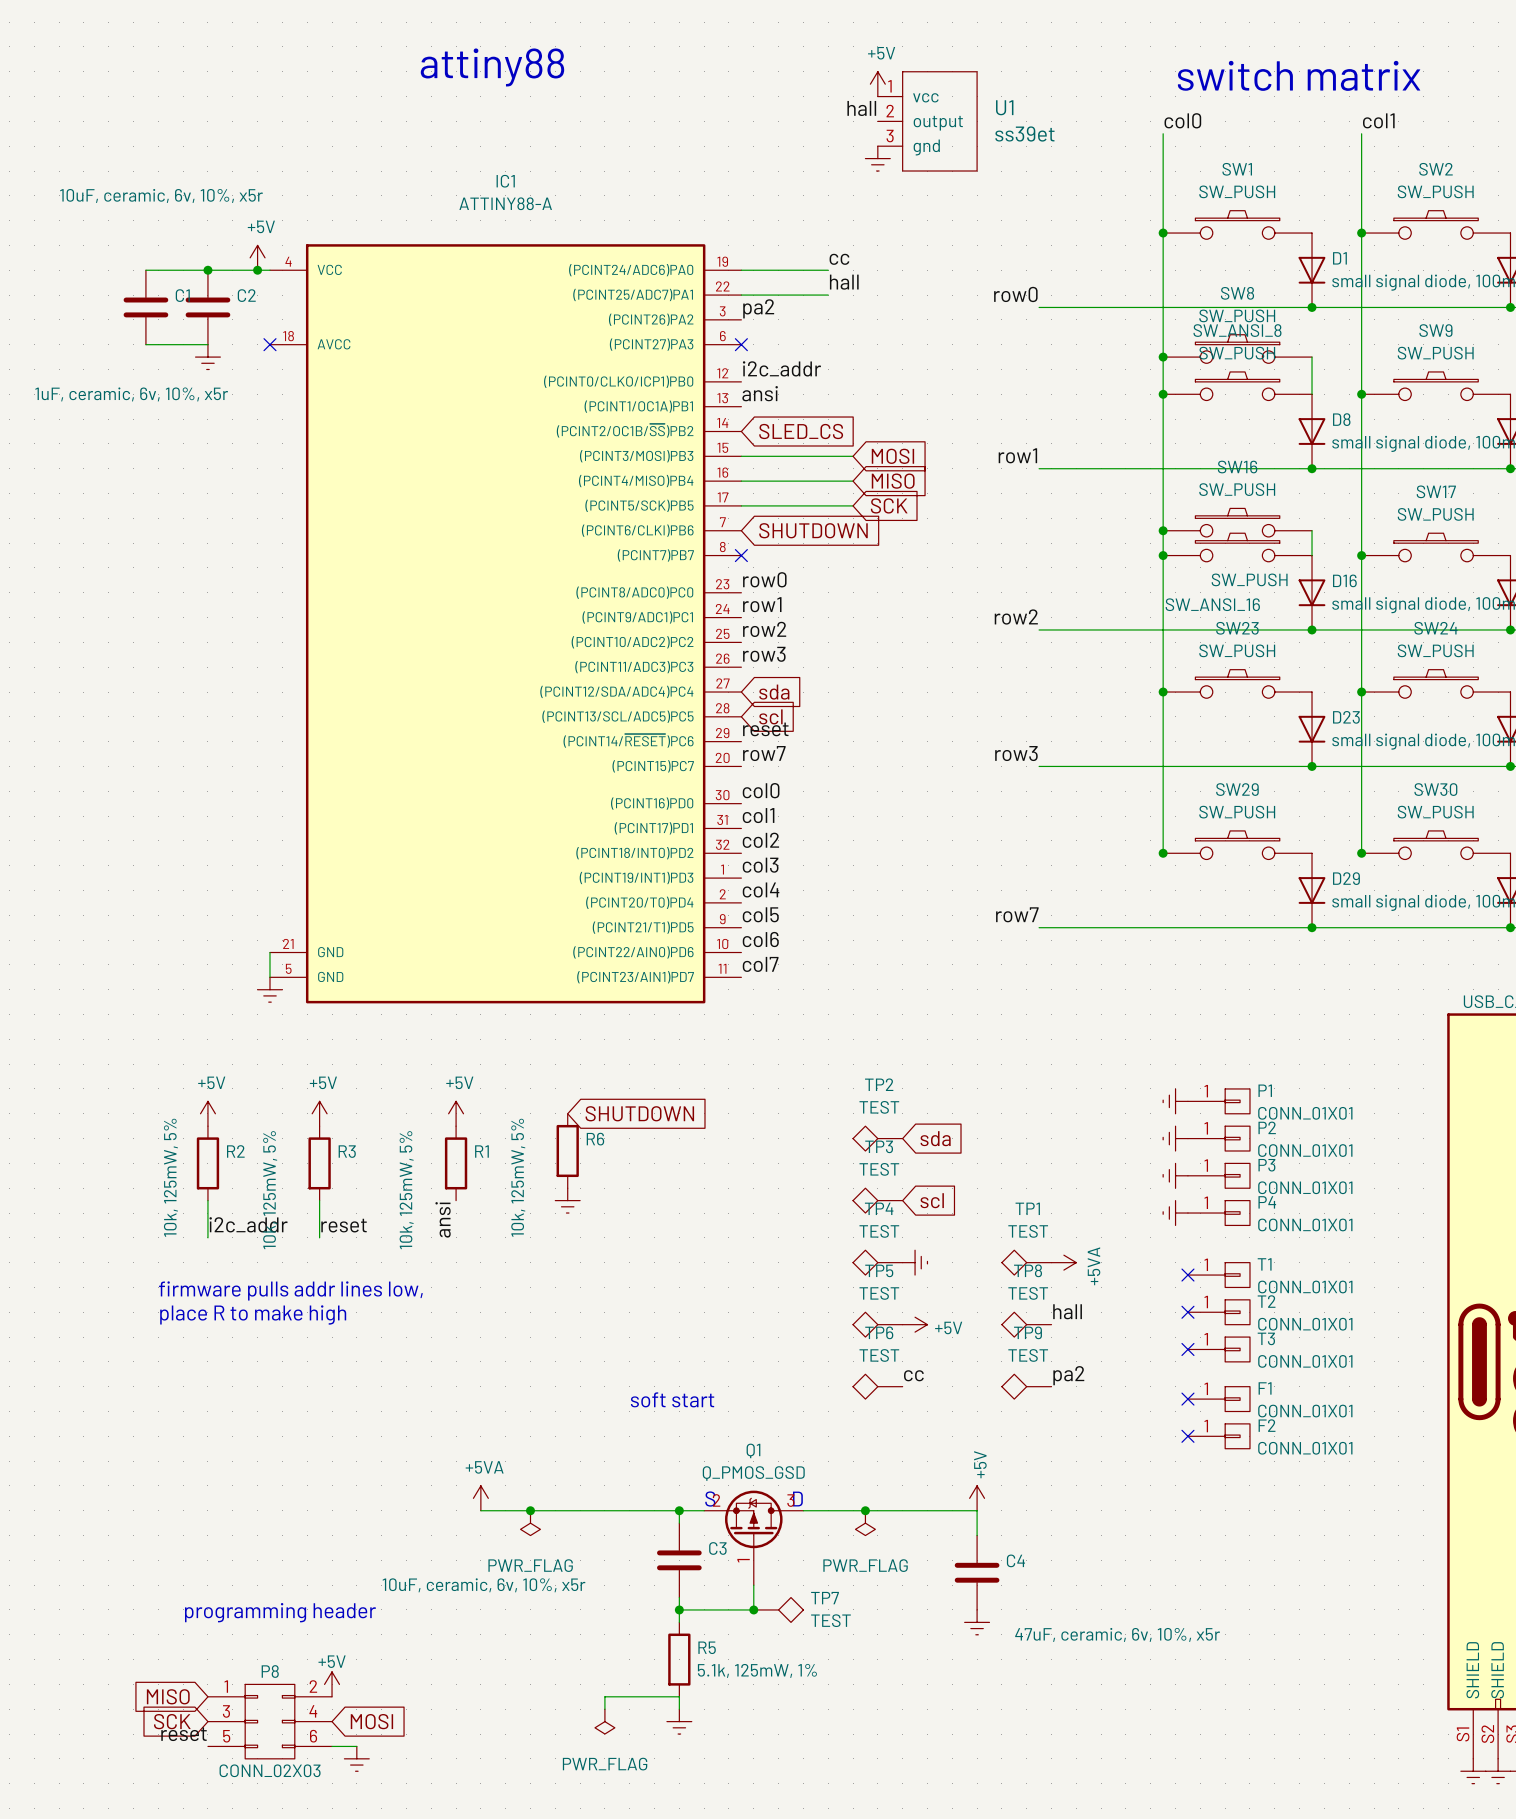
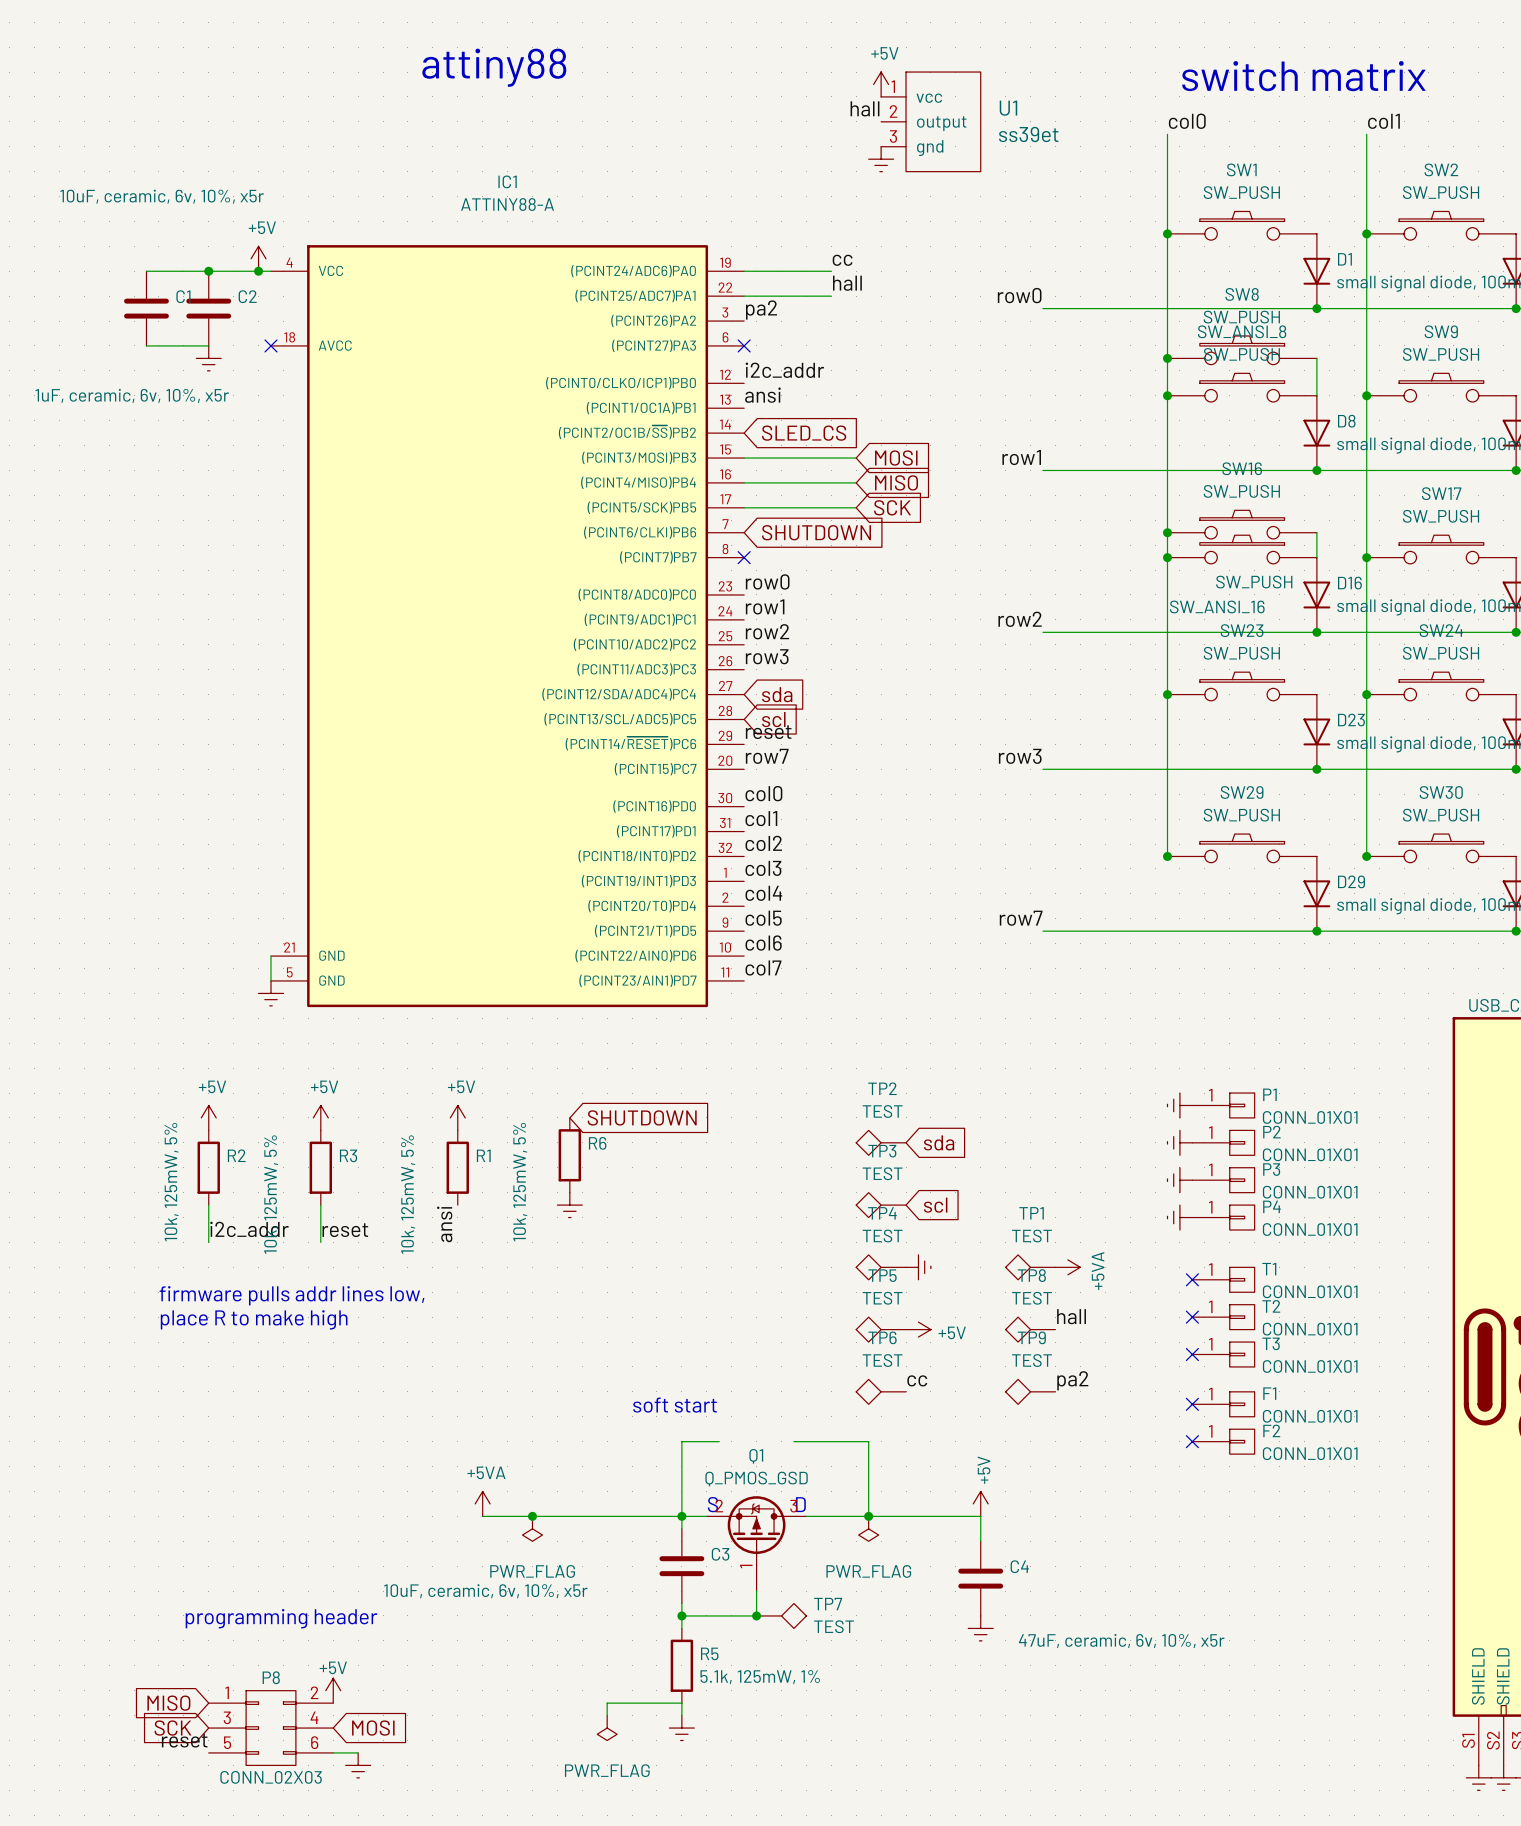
wire: none -> (719, 1441) (681, 1441) (681, 1516)
wire: none -> (793, 1441) (868, 1441) (868, 1516)

